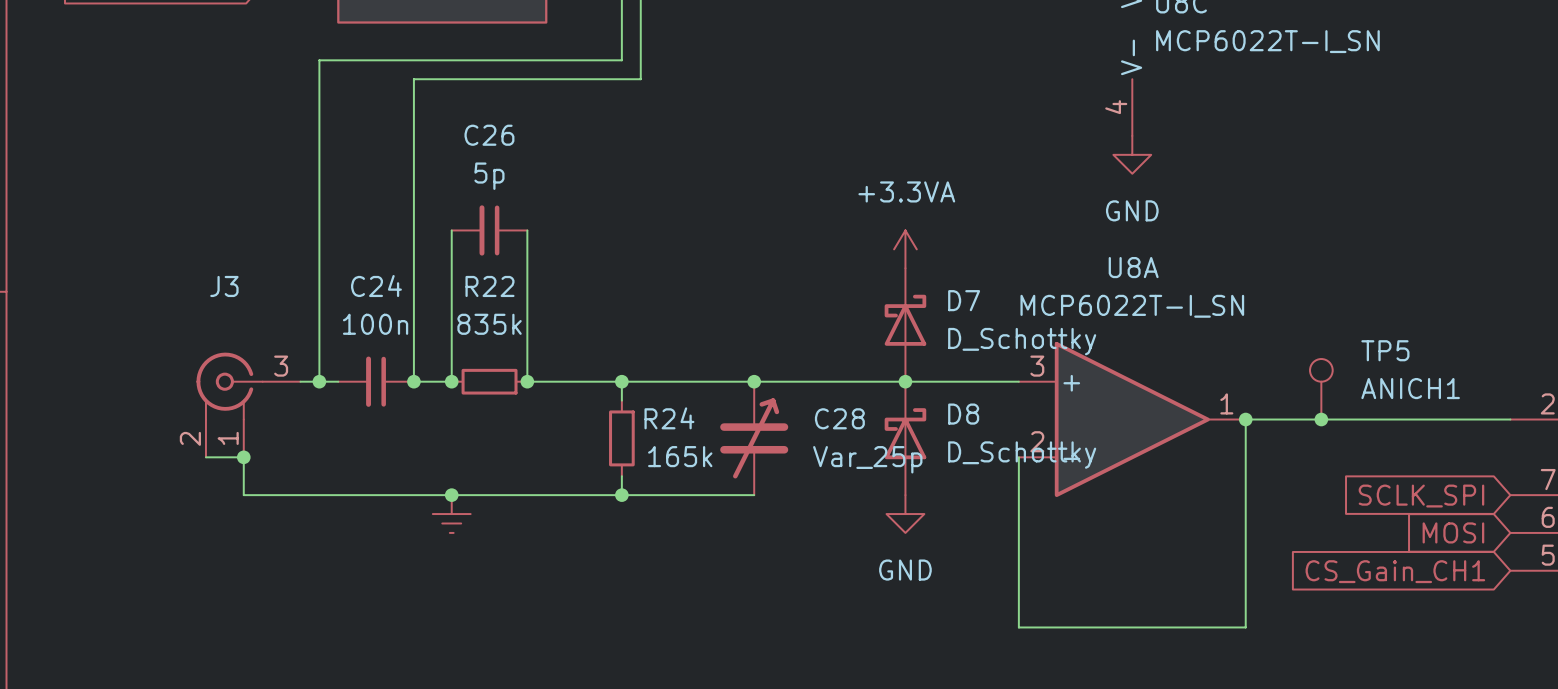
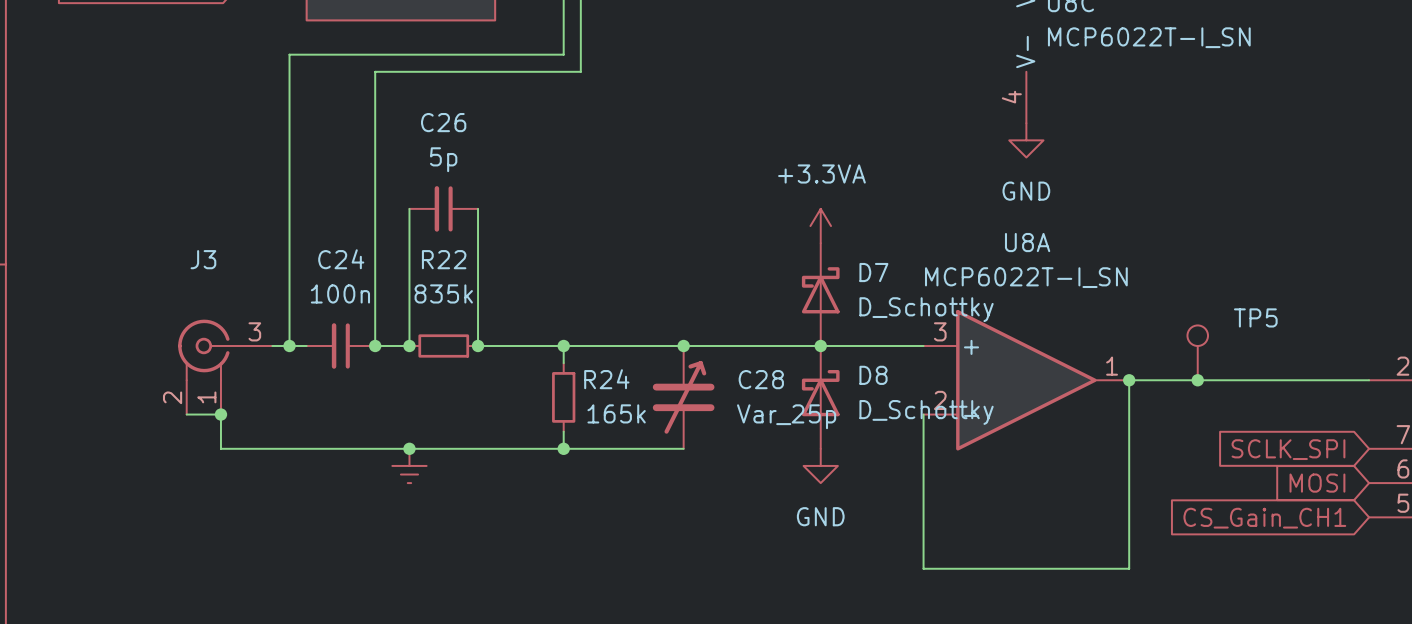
TP5 value: ANICH1 (1410, 388) -> none

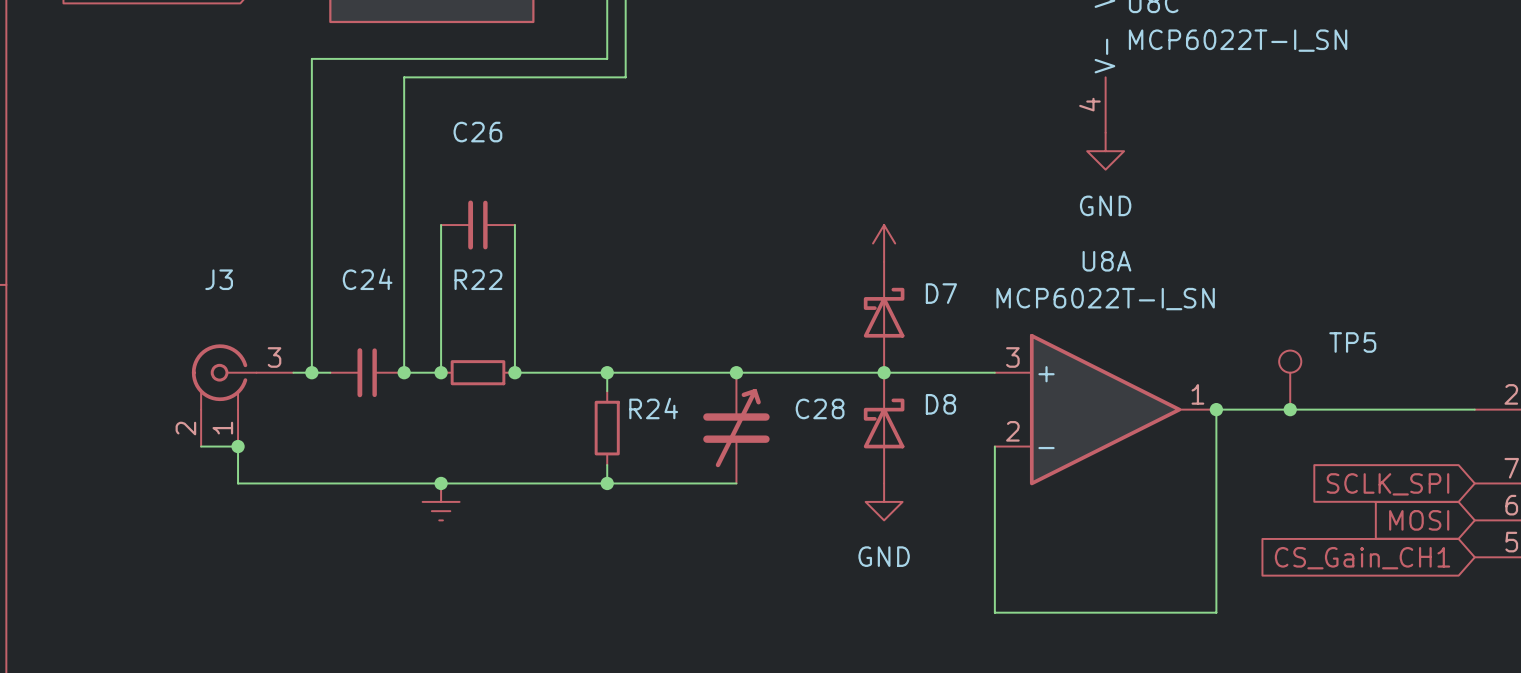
C26 value: 5p (443, 159) -> none
power symbol text: +3.3VA (821, 173) -> none
C24 value: 100n (340, 293) -> none
R22 value: 835k (443, 293) -> none
D7 value: D_Schottky (926, 309) -> none
D8 value: D_Schottky (926, 412) -> none
R24 value: 165k (616, 413) -> none
C28 value: Var_25p (786, 416) -> none

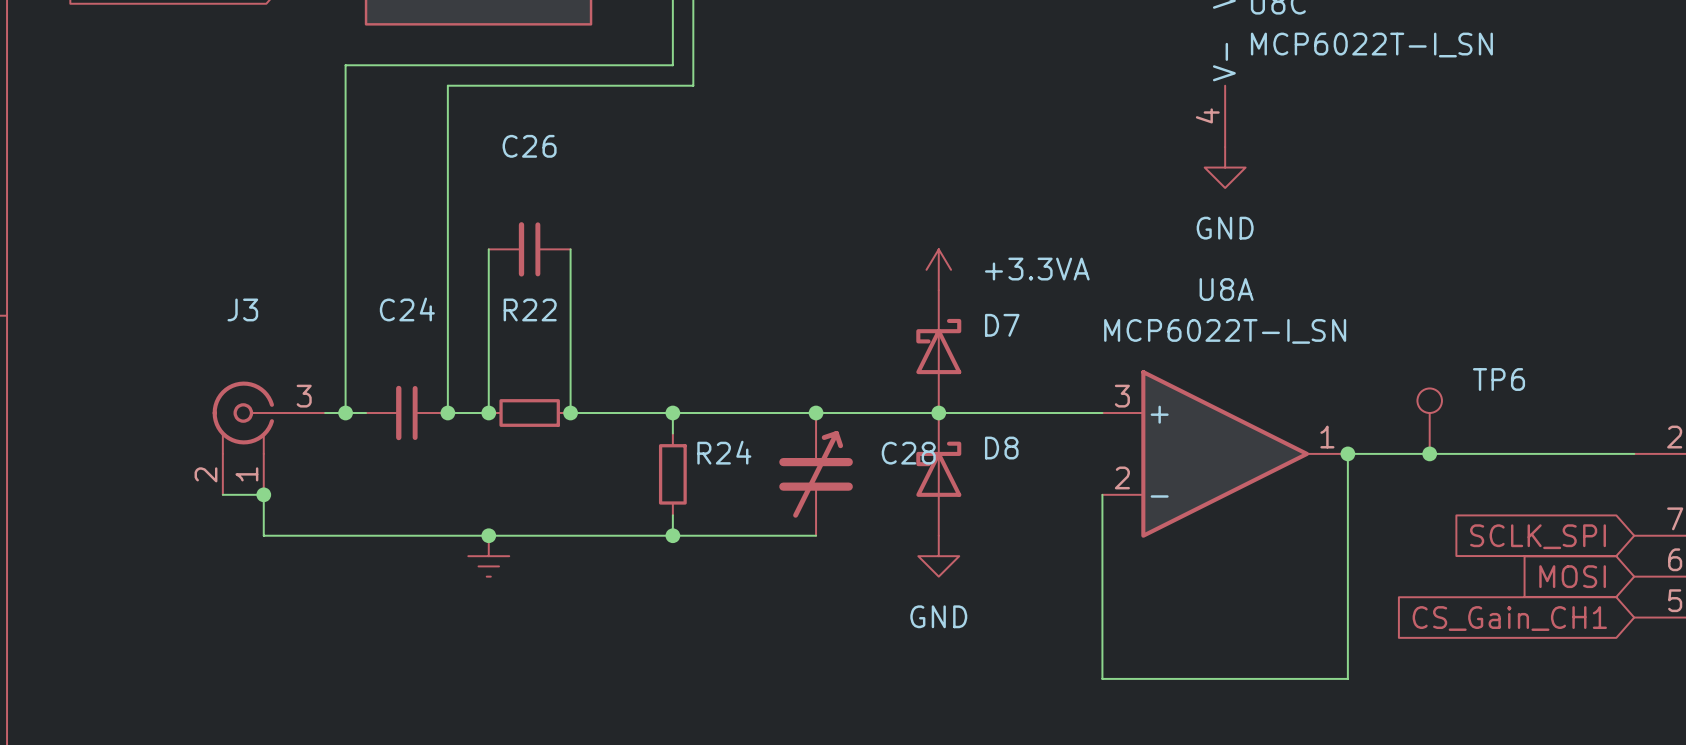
power symbol: none -> +3.3VA (938, 269)
power symbol: (884, 243) -> none
D7 position: (884, 317) -> (938, 351)
TP5 name: TP5 (1352, 342) -> TP6 (1499, 379)
junction position: (884, 372) -> (938, 413)
D8 position: (884, 428) -> (938, 474)
power symbol position: GND (884, 501) -> GND (938, 556)

